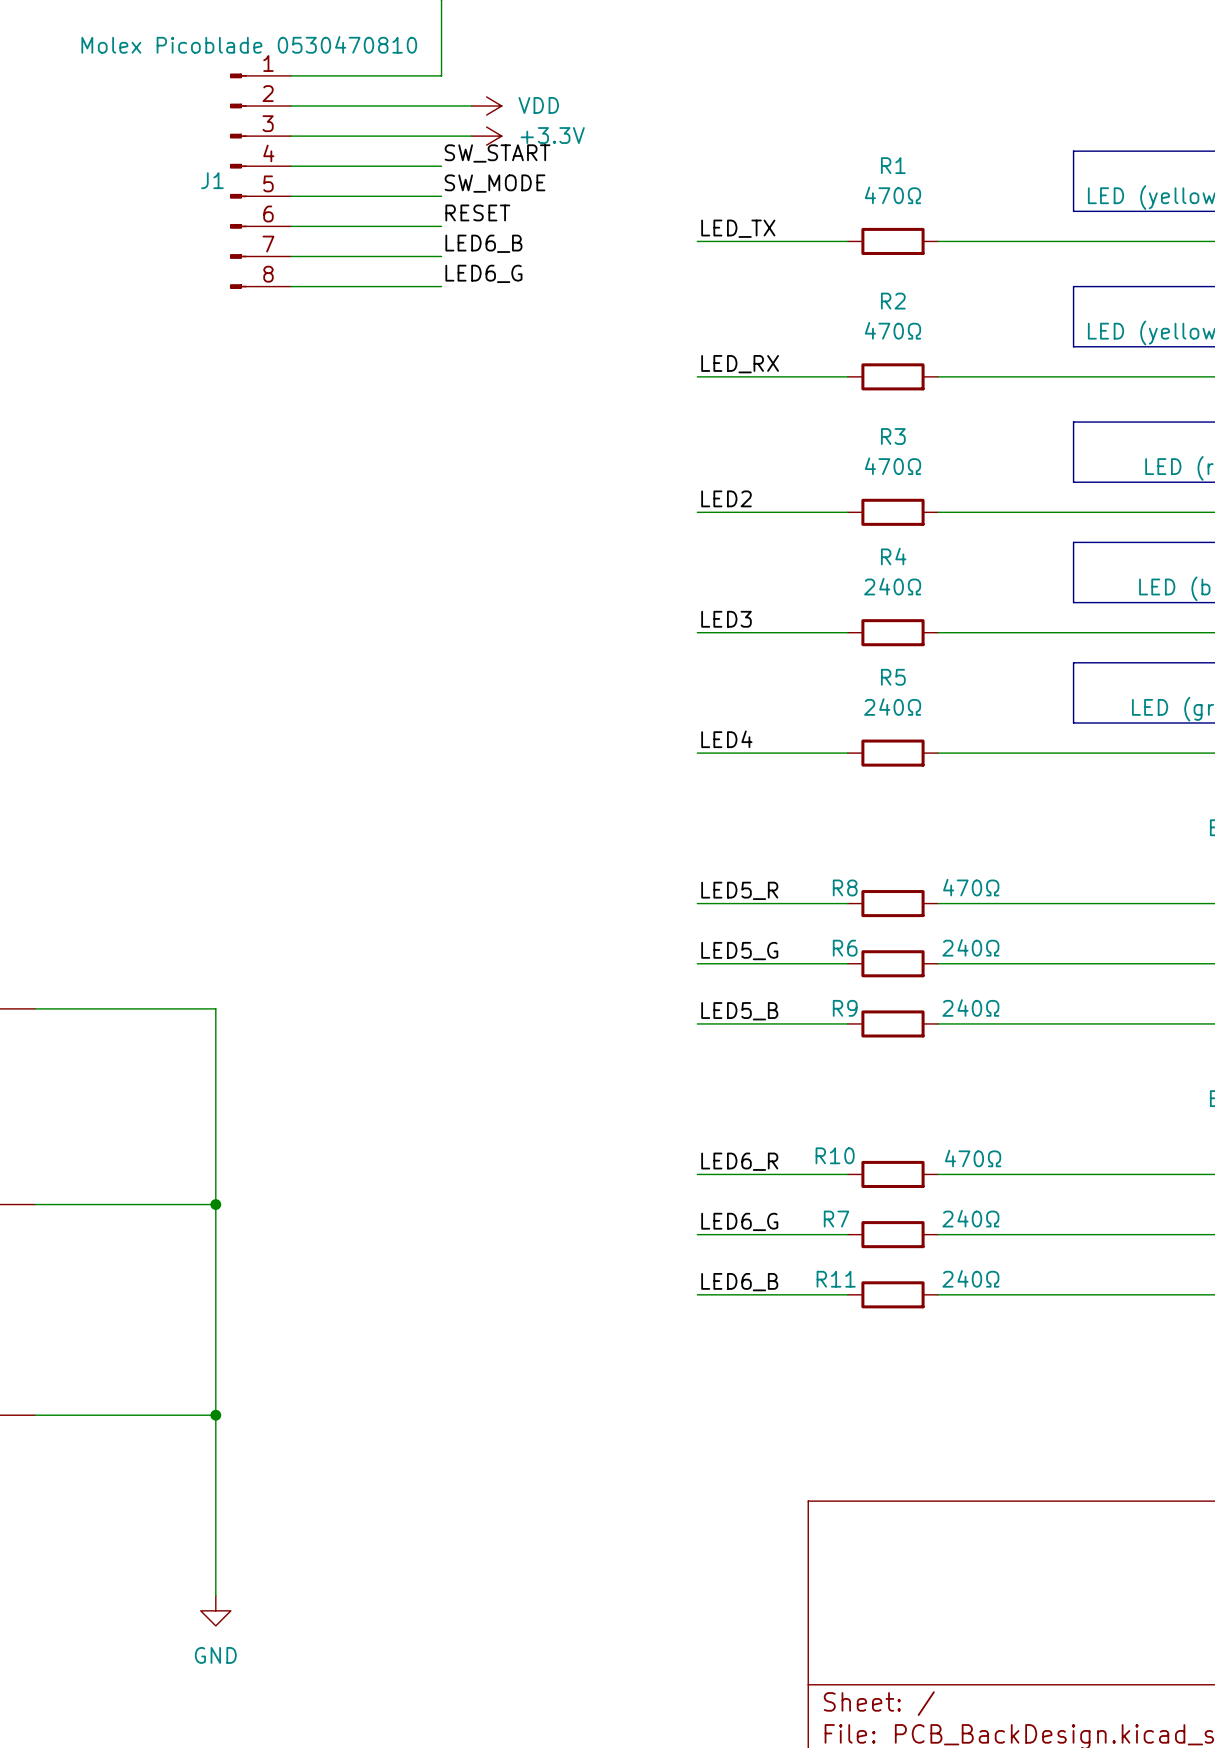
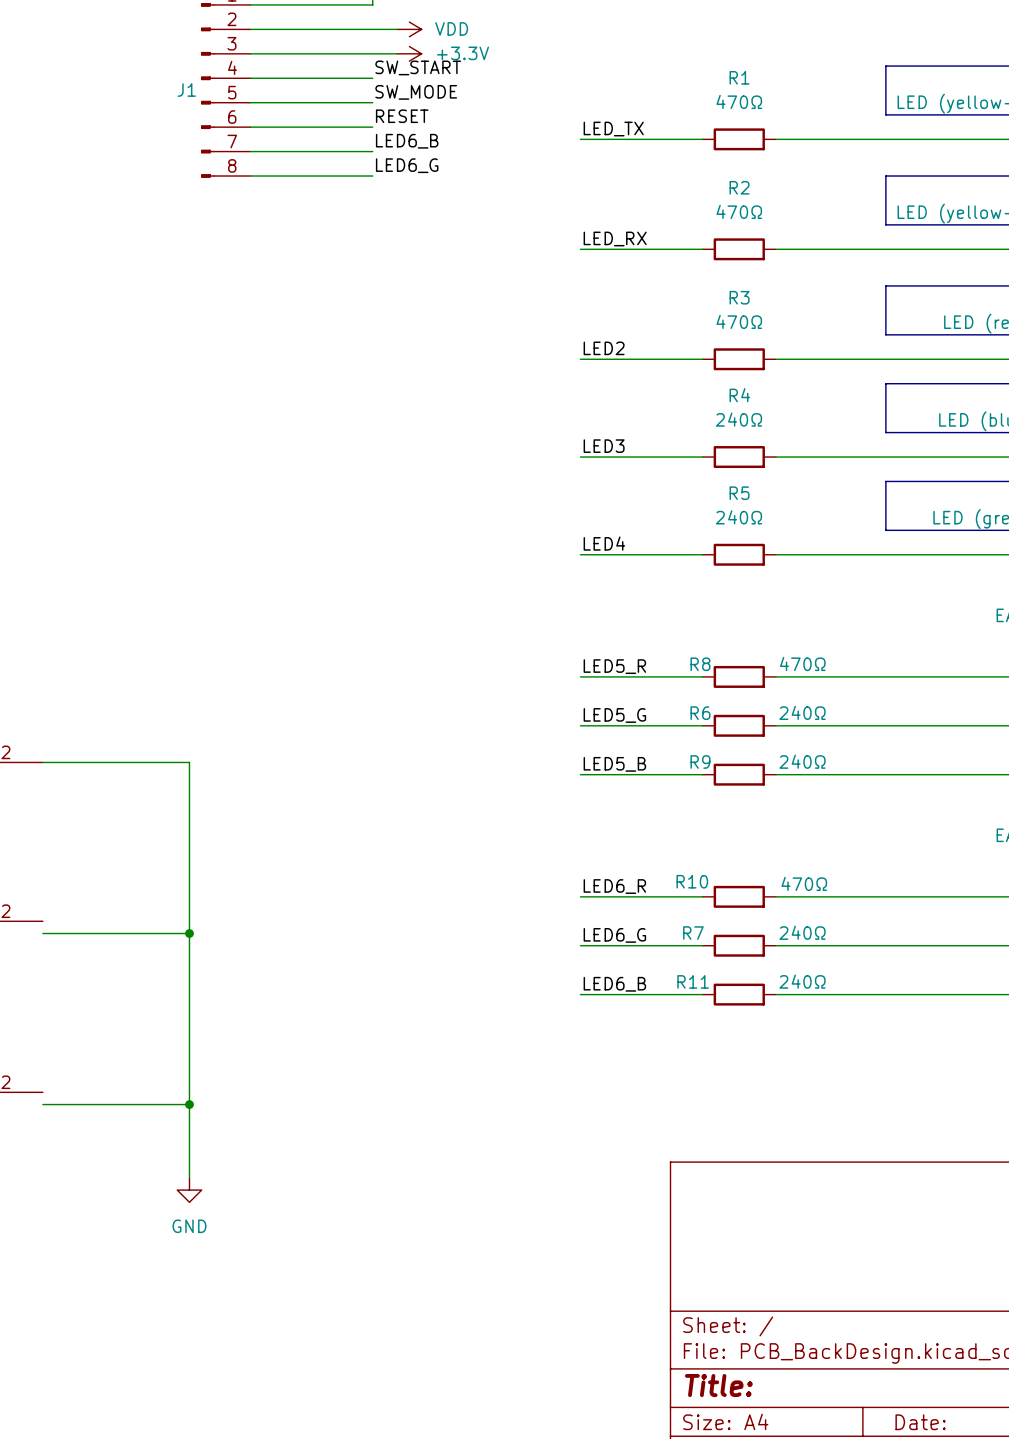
wire: (35, 1204) (215, 1204) -> (42, 933) (189, 933)
junction position: (215, 1204) -> (189, 933)
wire: (35, 1415) (215, 1415) -> (42, 1104) (189, 1104)
junction position: (215, 1415) -> (189, 1104)
wire: (215, 1520) (215, 1595) -> none
power symbol position: GND (215, 1610) -> GND (189, 1190)

